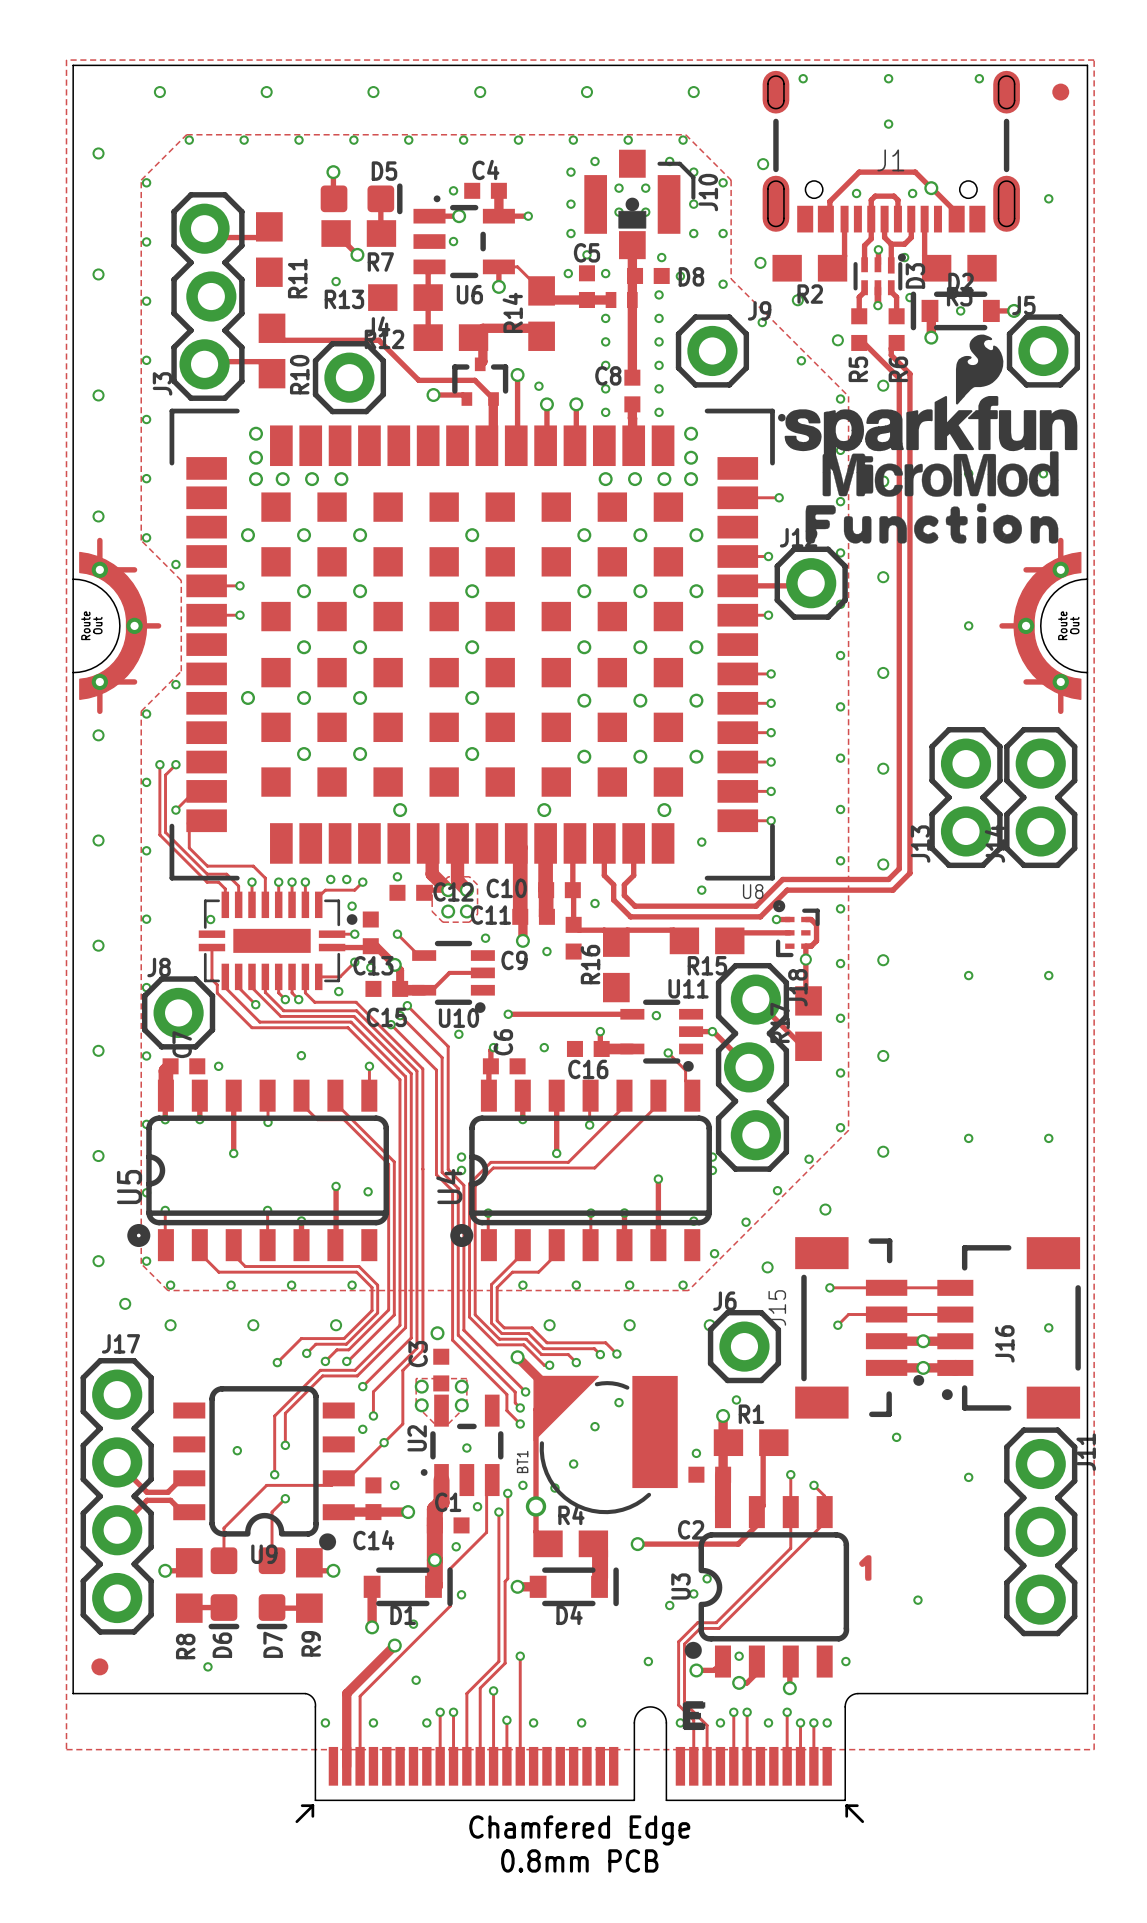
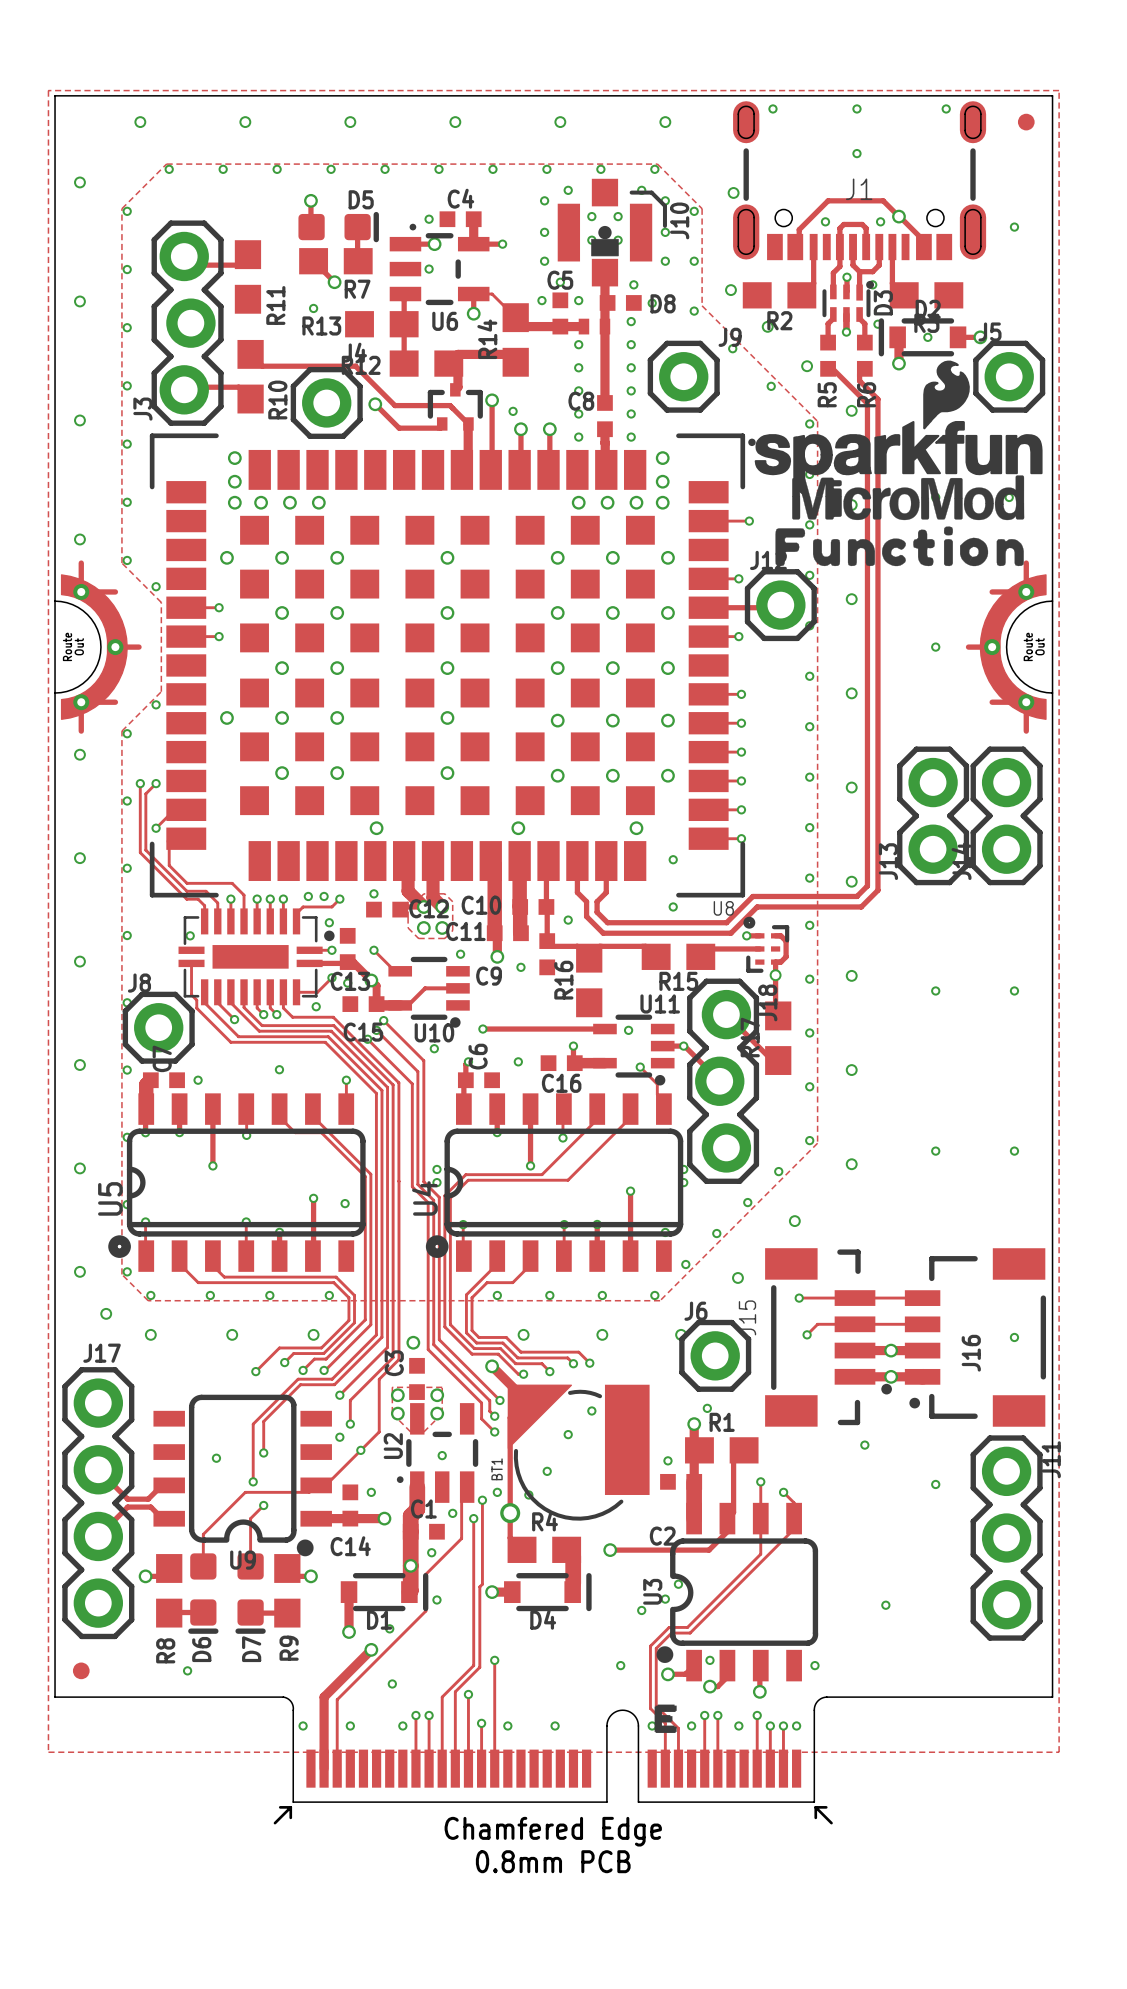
track: (433, 395) (462, 395) (466, 399) -> (375, 404) (399, 428) (440, 428) (442, 423)
via position: (433, 395) -> (375, 404)
drawing: [859, 1555, 872, 1581] -> none

